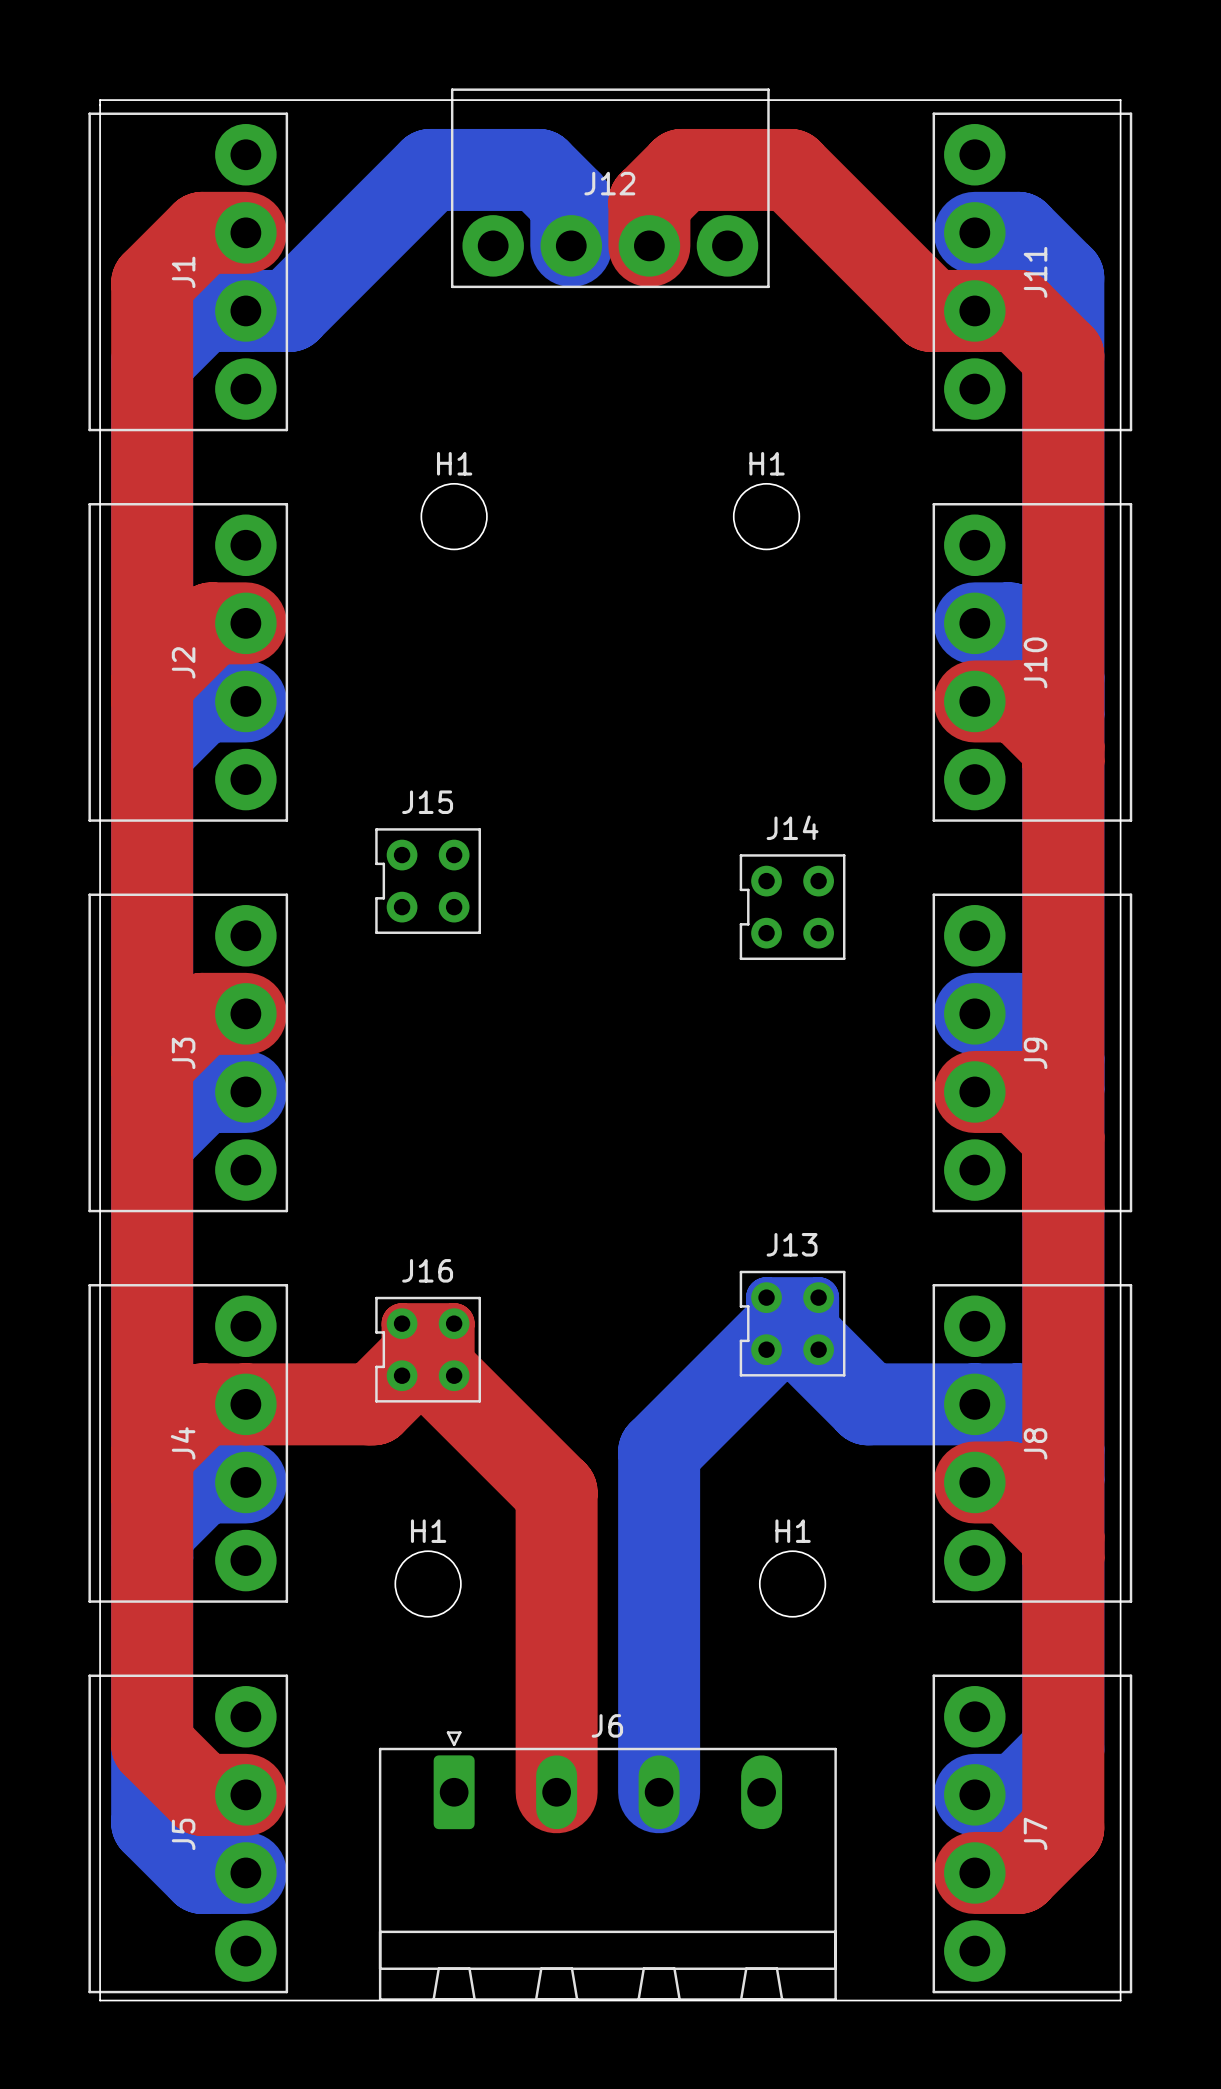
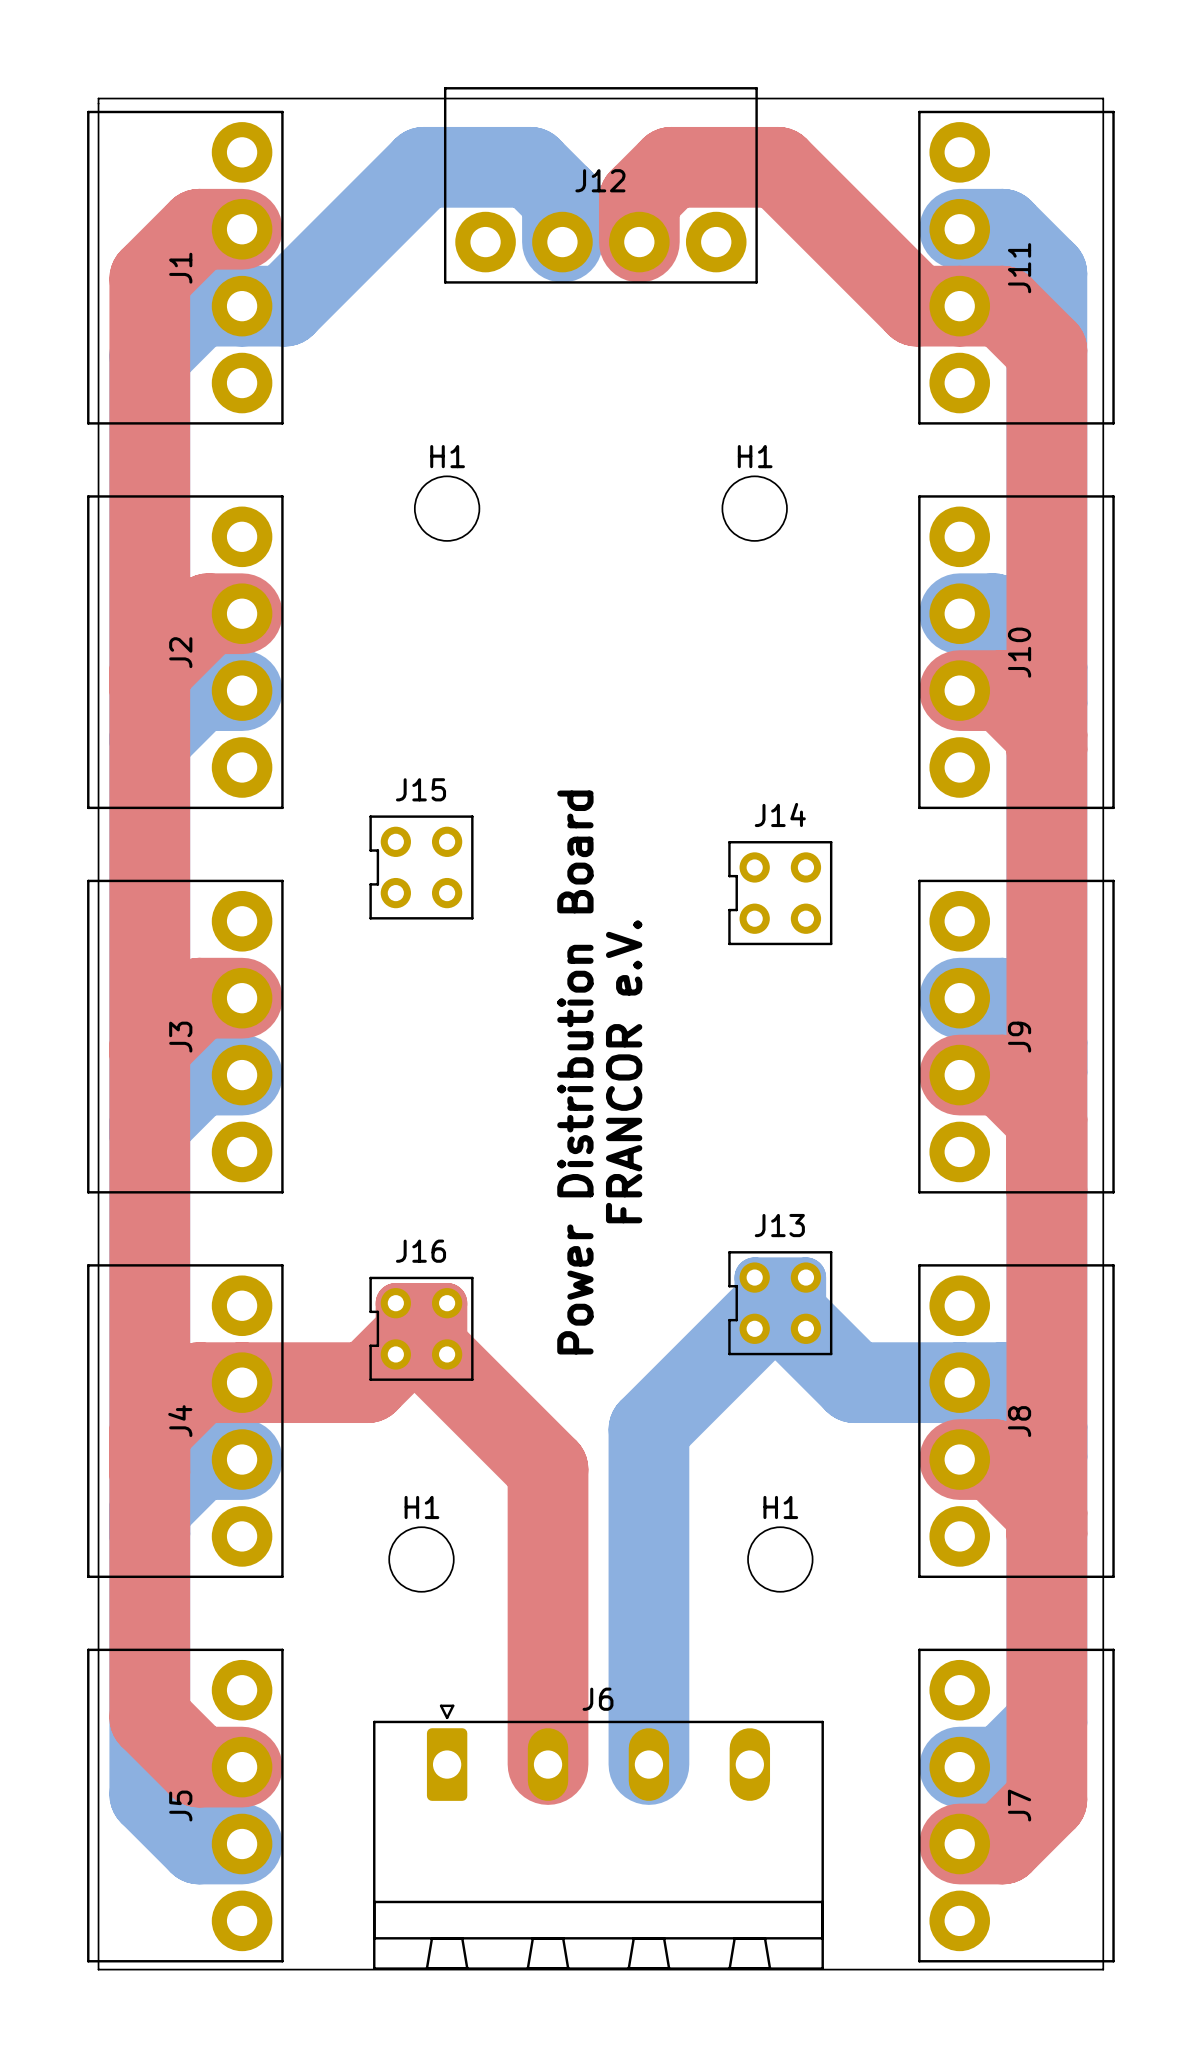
text: none -> FRANCOR e.V. (624, 1071)
text: none -> Power Distribution Board (575, 1072)

